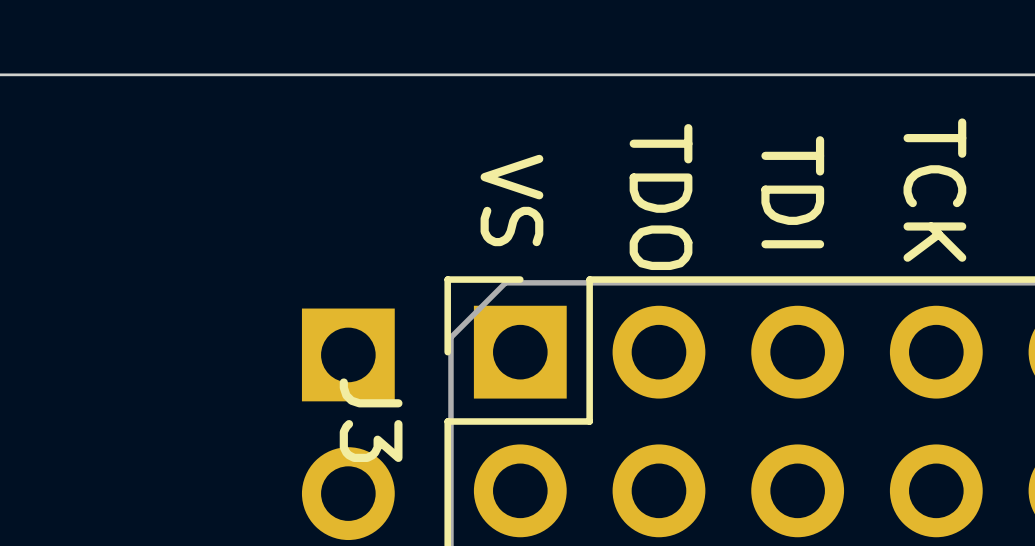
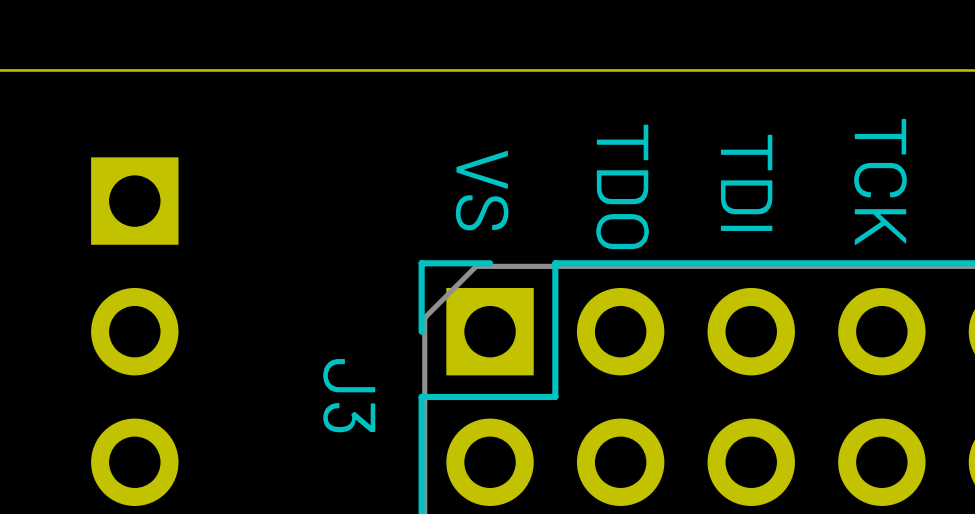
part: none -> (134, 331)
part: (348, 424) -> none

